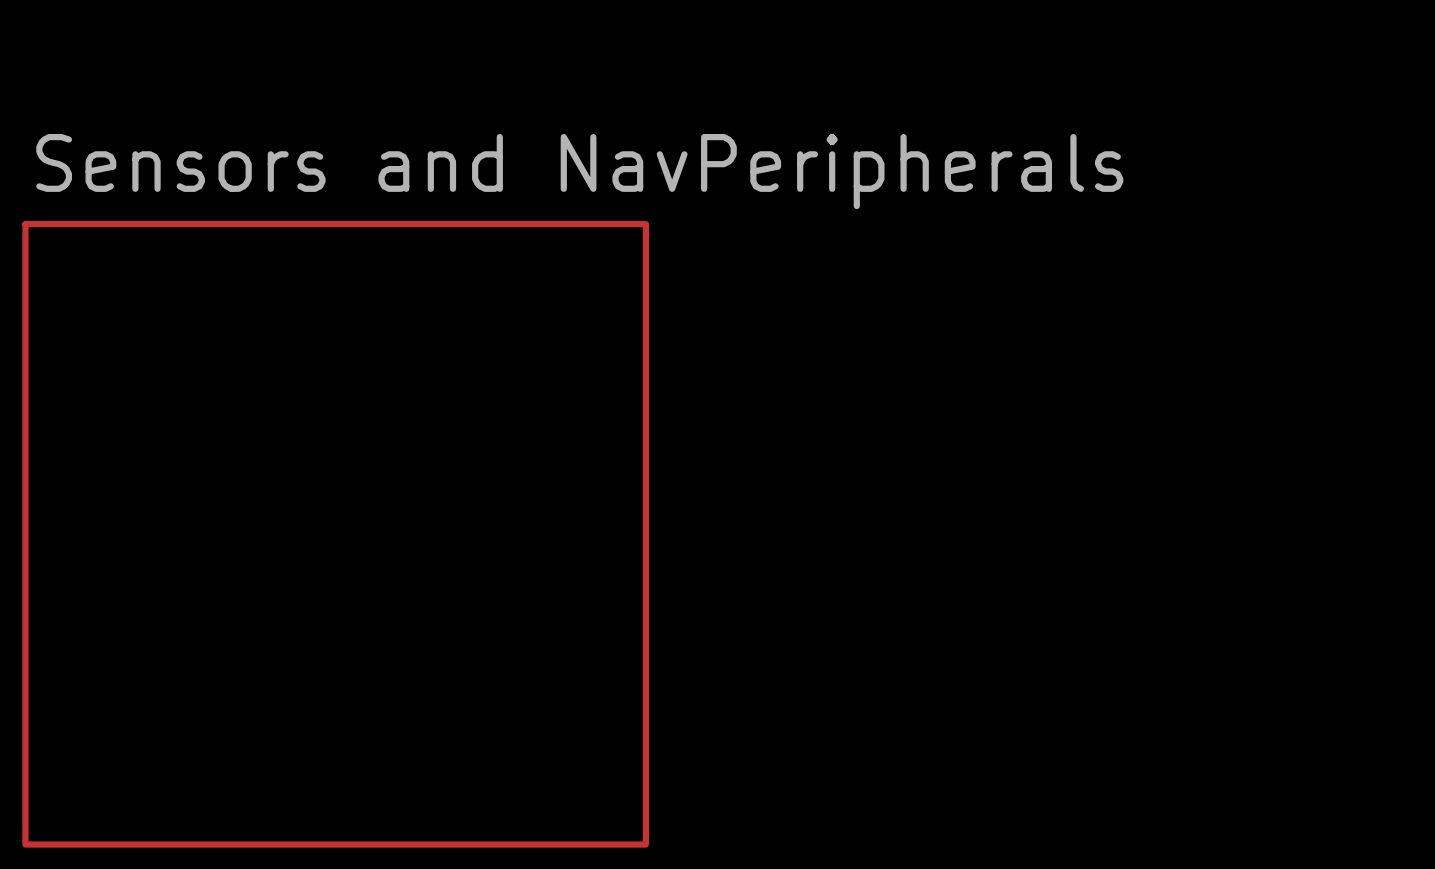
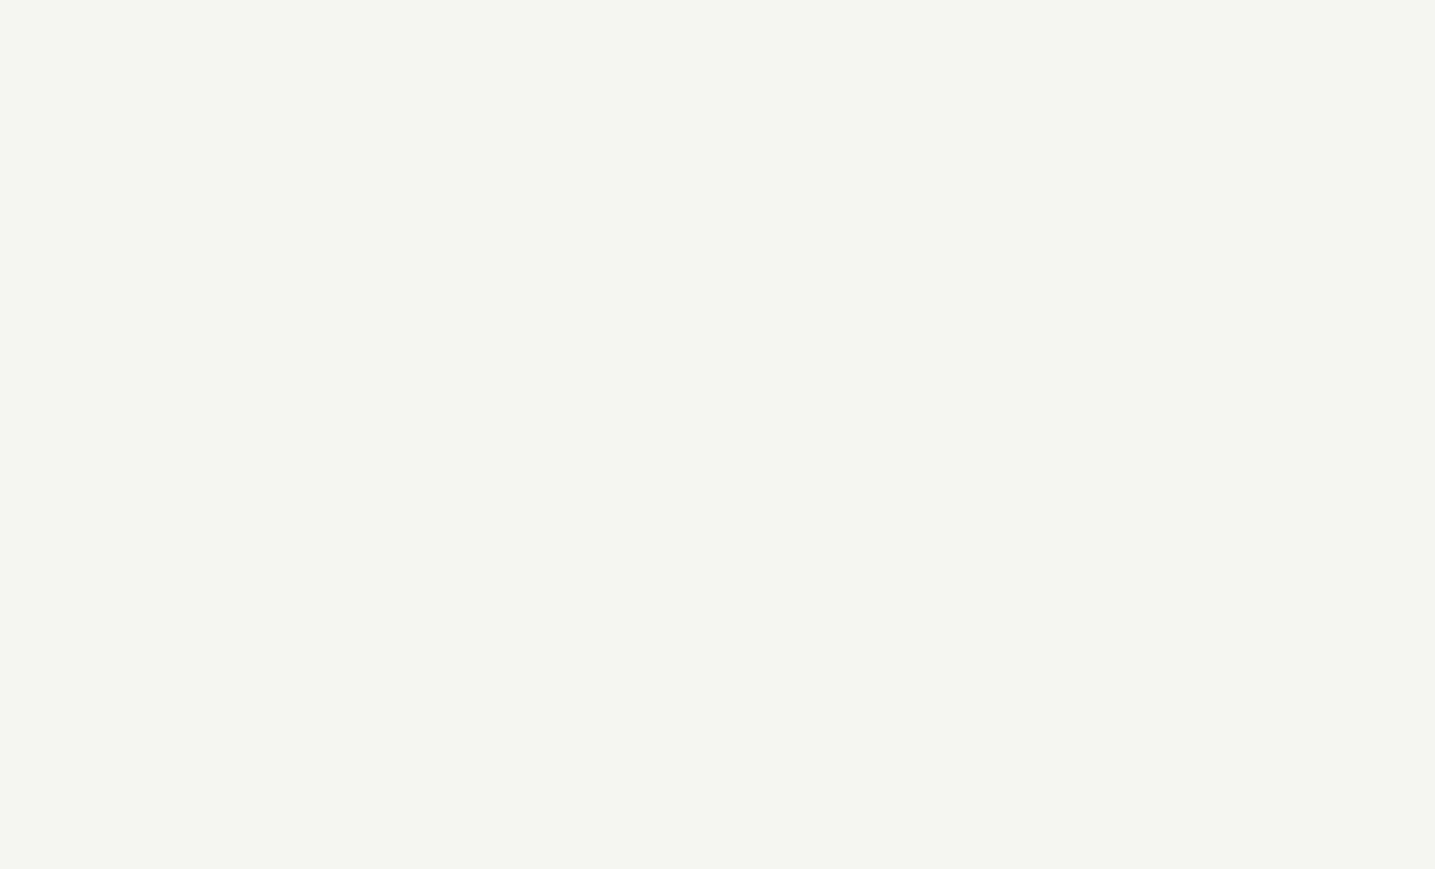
sheet Sensors and NavPeripherals: (335, 534) -> none

